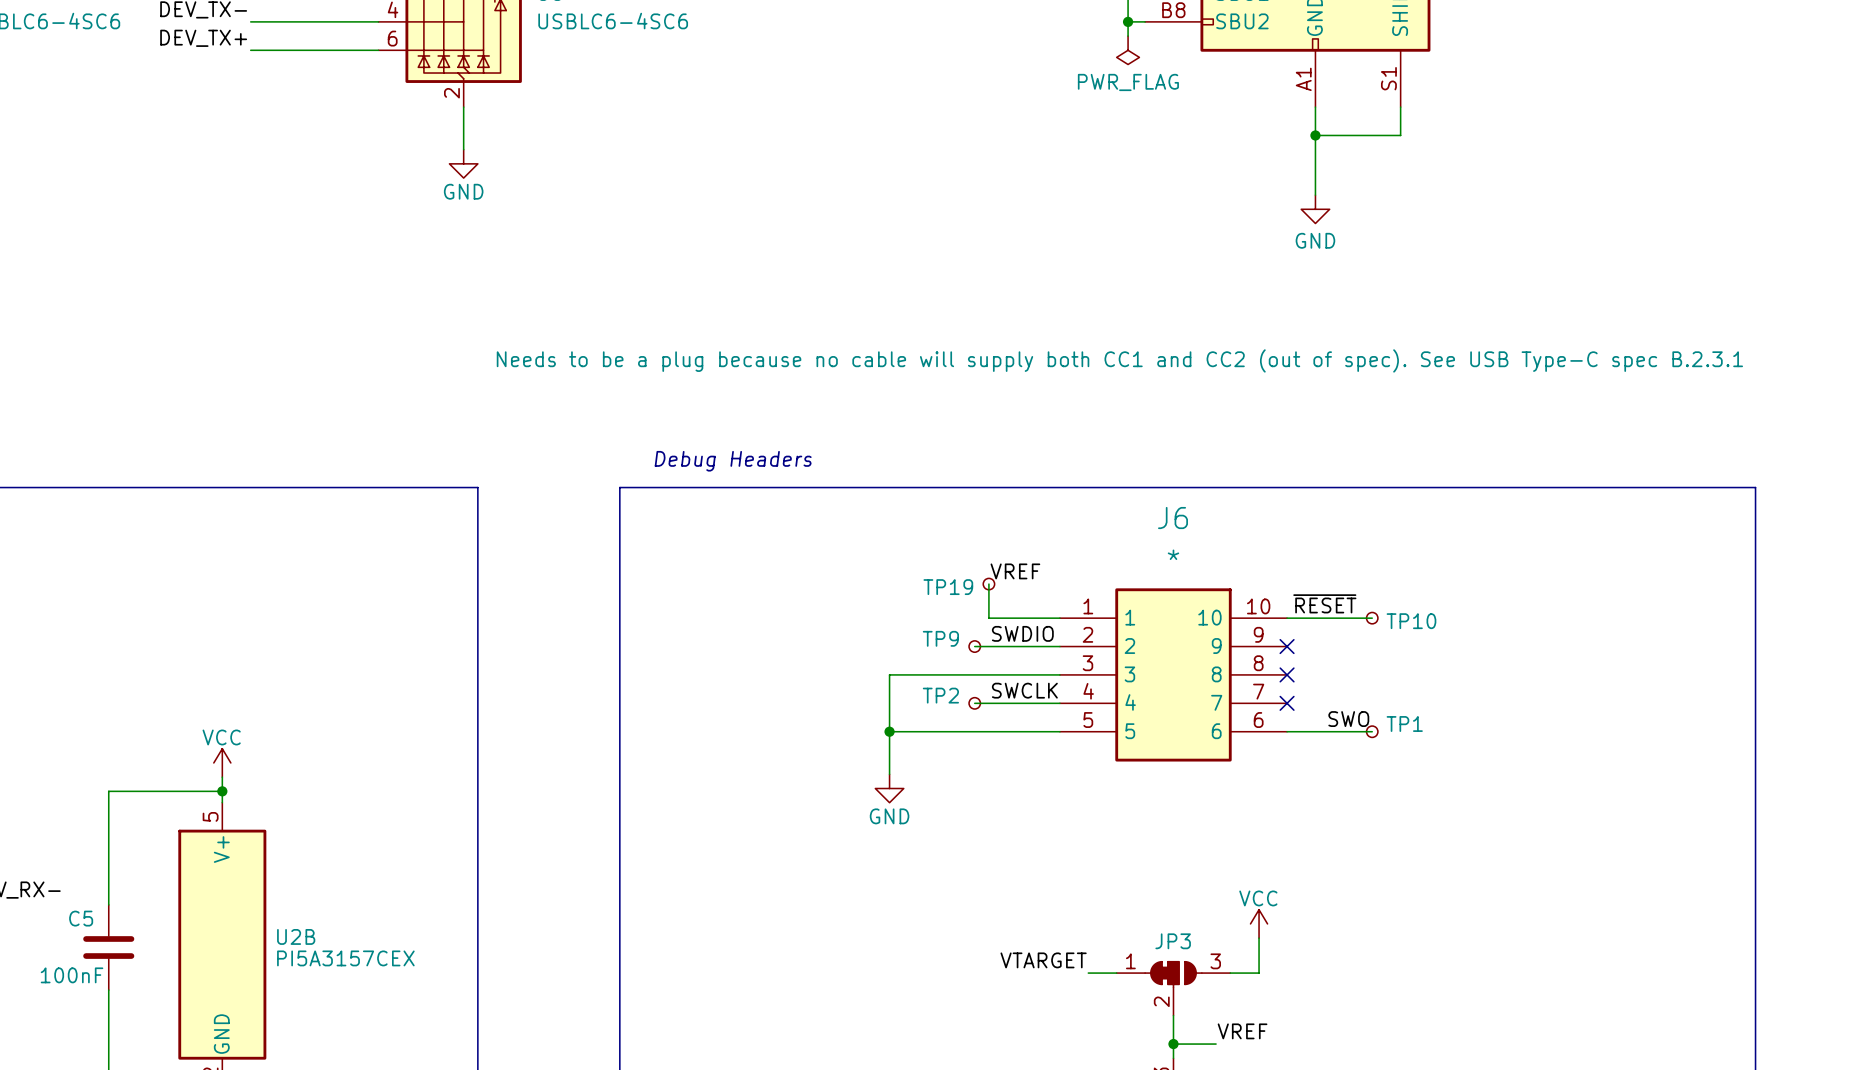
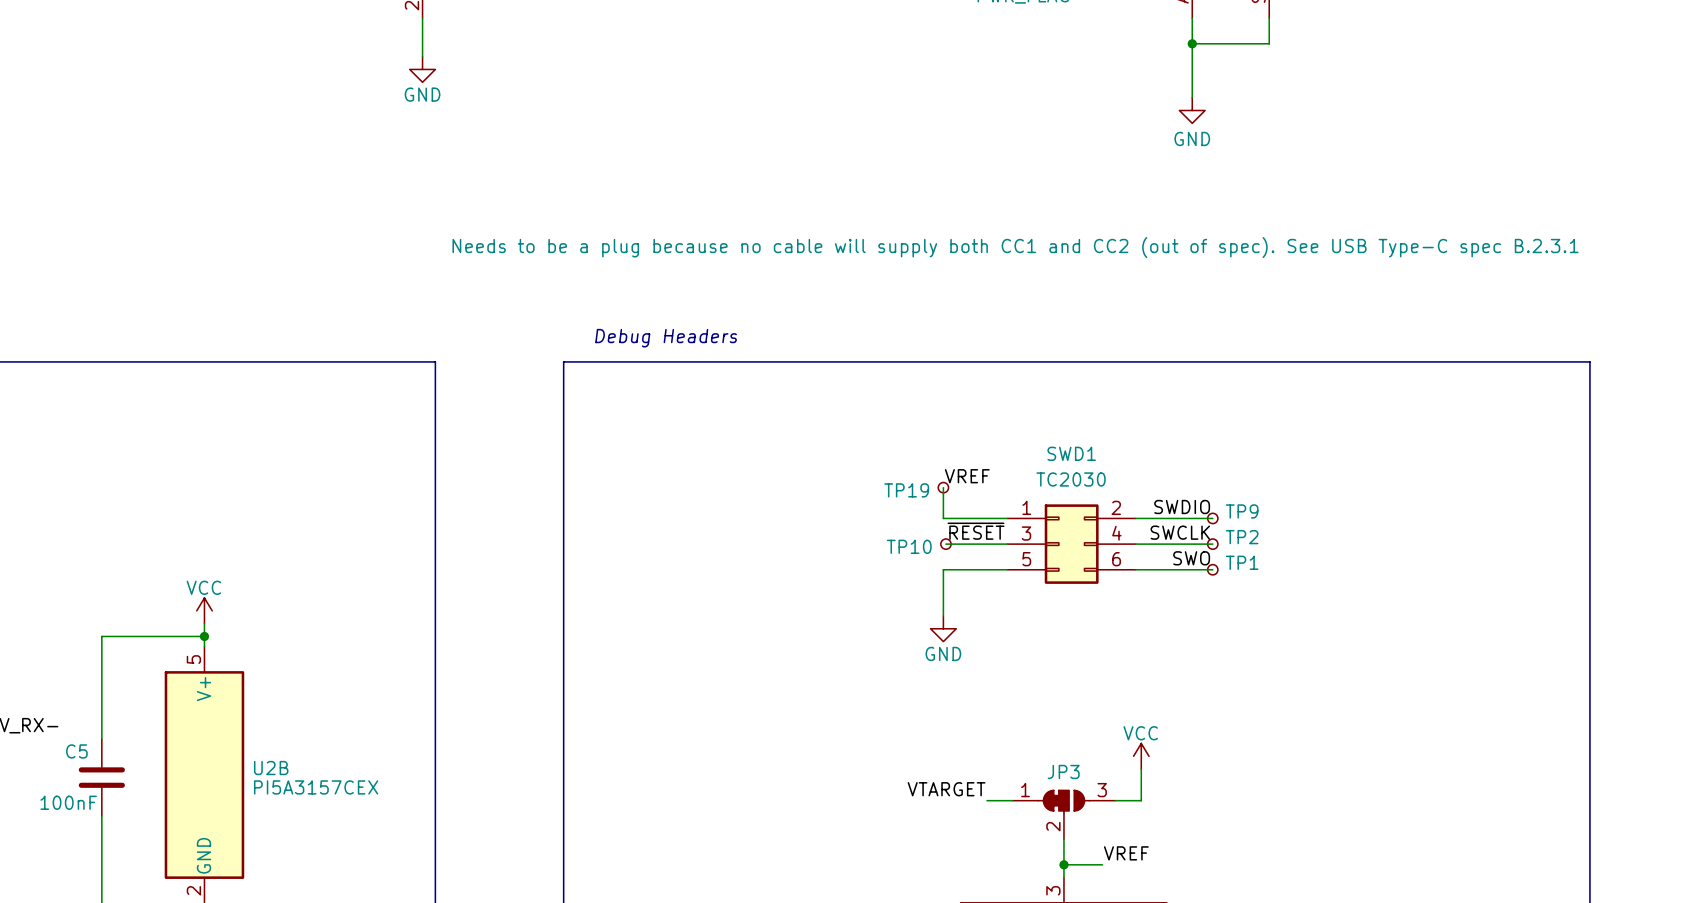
label position: VREF (1015, 571) -> VREF (967, 476)
wire: (988, 584) (988, 618) (1059, 618) -> (943, 487) (943, 518) (1007, 518)
TP19 position: (988, 584) -> (943, 487)
label: ~{RESET} (1324, 603) -> none
wire: (1287, 618) (1372, 618) -> none
TP10 position: (1372, 618) -> (945, 544)
TP10 name position: TP10 (1411, 621) -> TP10 (909, 546)
label: SWDIO (1022, 633) -> none
TP9 name position: TP9 (940, 638) -> TP9 (1242, 511)
wire: (974, 646) (1059, 646) -> (1135, 518) (1212, 518)
TP9 position: (974, 646) -> (1212, 518)
no-connect mark: (1287, 646) -> none
label: none -> SWDIO (1182, 507)
wire: (1059, 674) (889, 674) (889, 774) -> none
label: none -> ~{RESET} (976, 531)
J6: * (1173, 674) -> none
no-connect mark: (1287, 674) -> none
label: none -> SWCLK (1180, 532)
wire: none -> (945, 544) (1007, 544)
SWD1: none -> TC2030 (1071, 544)
label: SWCLK (1024, 690) -> none
TP2 name position: TP2 (940, 695) -> TP2 (1242, 537)
wire: (974, 703) (1059, 703) -> (1135, 569) (1212, 569)
TP2 position: (974, 703) -> (1212, 544)
no-connect mark: (1287, 703) -> none
wire: none -> (1007, 569) (943, 569) (943, 615)
label position: SWO (1348, 719) -> SWO (1191, 558)
wire: (889, 731) (1059, 731) -> none
junction: (889, 731) -> none
wire: (1287, 731) (1372, 731) -> (1135, 544) (1212, 544)
TP1 position: (1372, 731) -> (1212, 569)
power symbol position: GND (889, 788) -> GND (943, 628)

